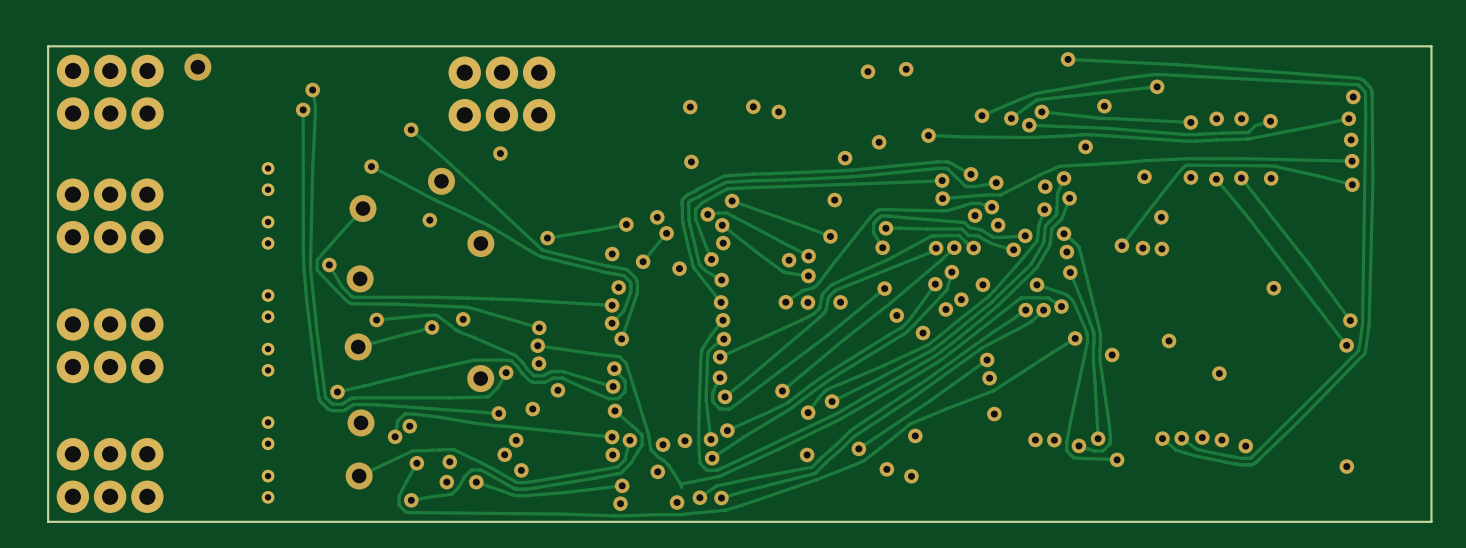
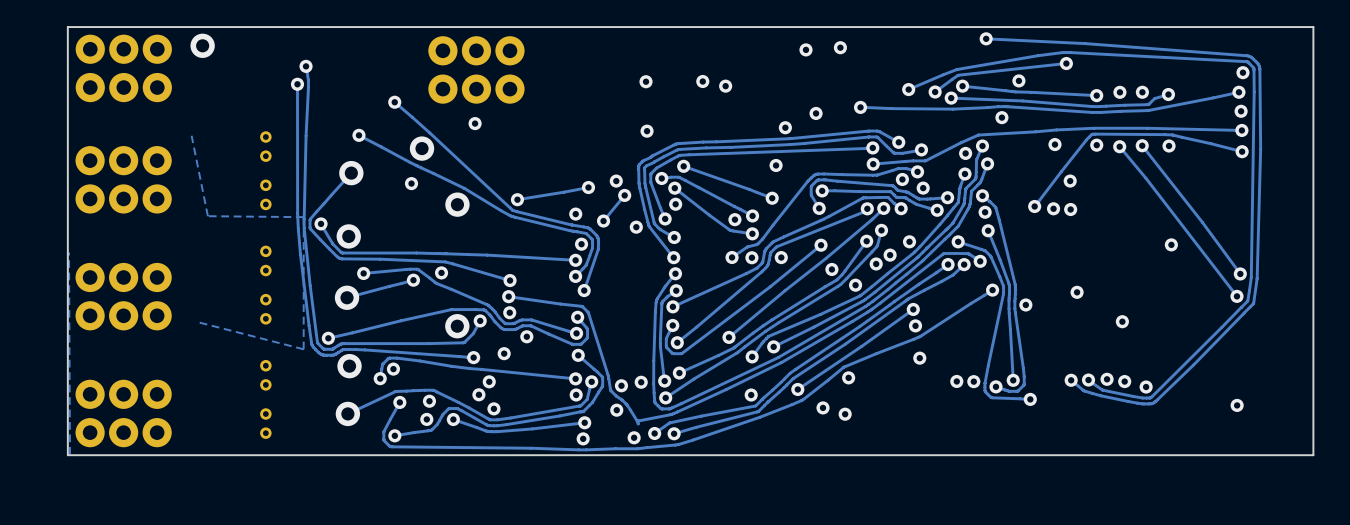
zone outline: none -> (191, 135) (207, 216) (303, 217) (303, 349) (195, 321)
zone outline: none -> (69, 252) (69, 454)

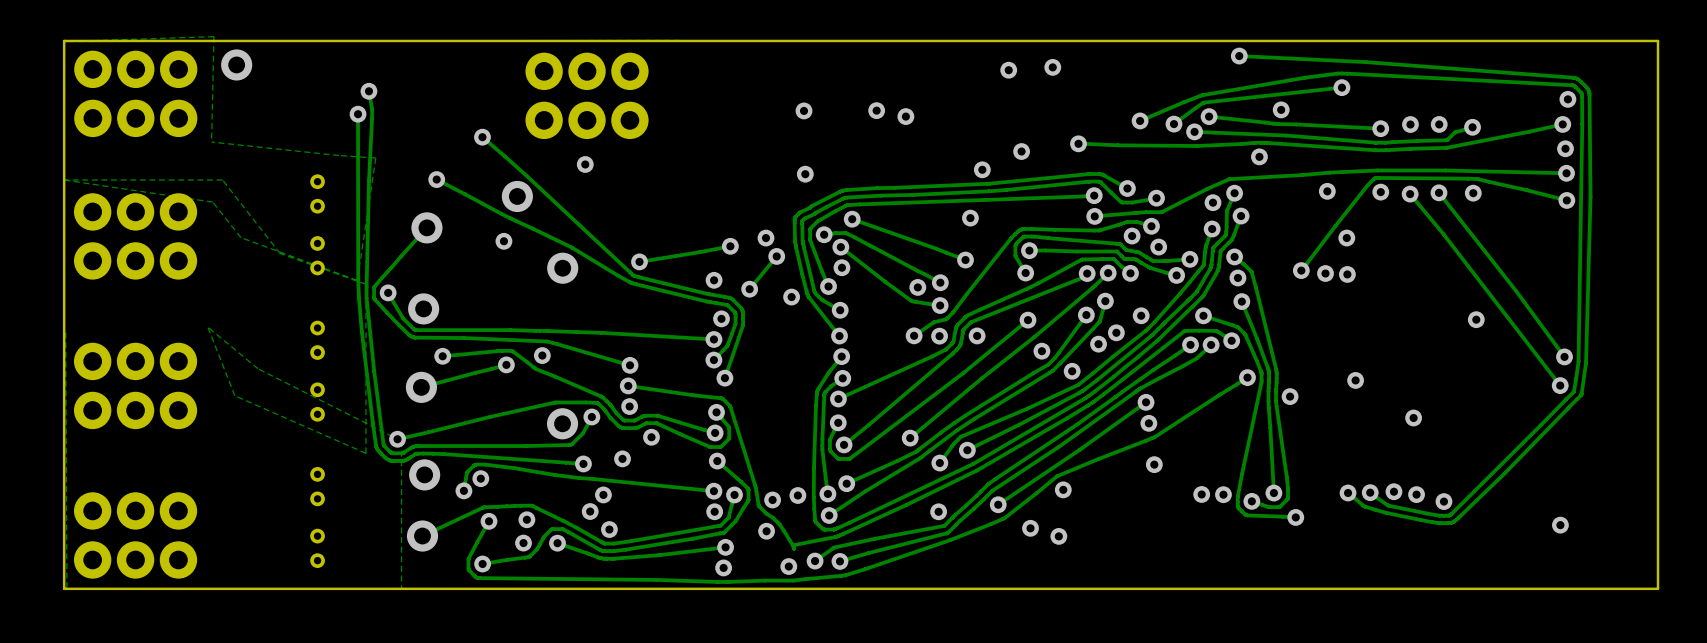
zone outline: (191, 135) (207, 216) (303, 217) -> (679, 40) (64, 41) (213, 36) (211, 142) (375, 157) (357, 280) (240, 237) (212, 202) (64, 180) (222, 180) (280, 253) (365, 284)
zone outline: (195, 321) (303, 349) -> (401, 588) (401, 441) (258, 368) (207, 327) (234, 395) (365, 453)

